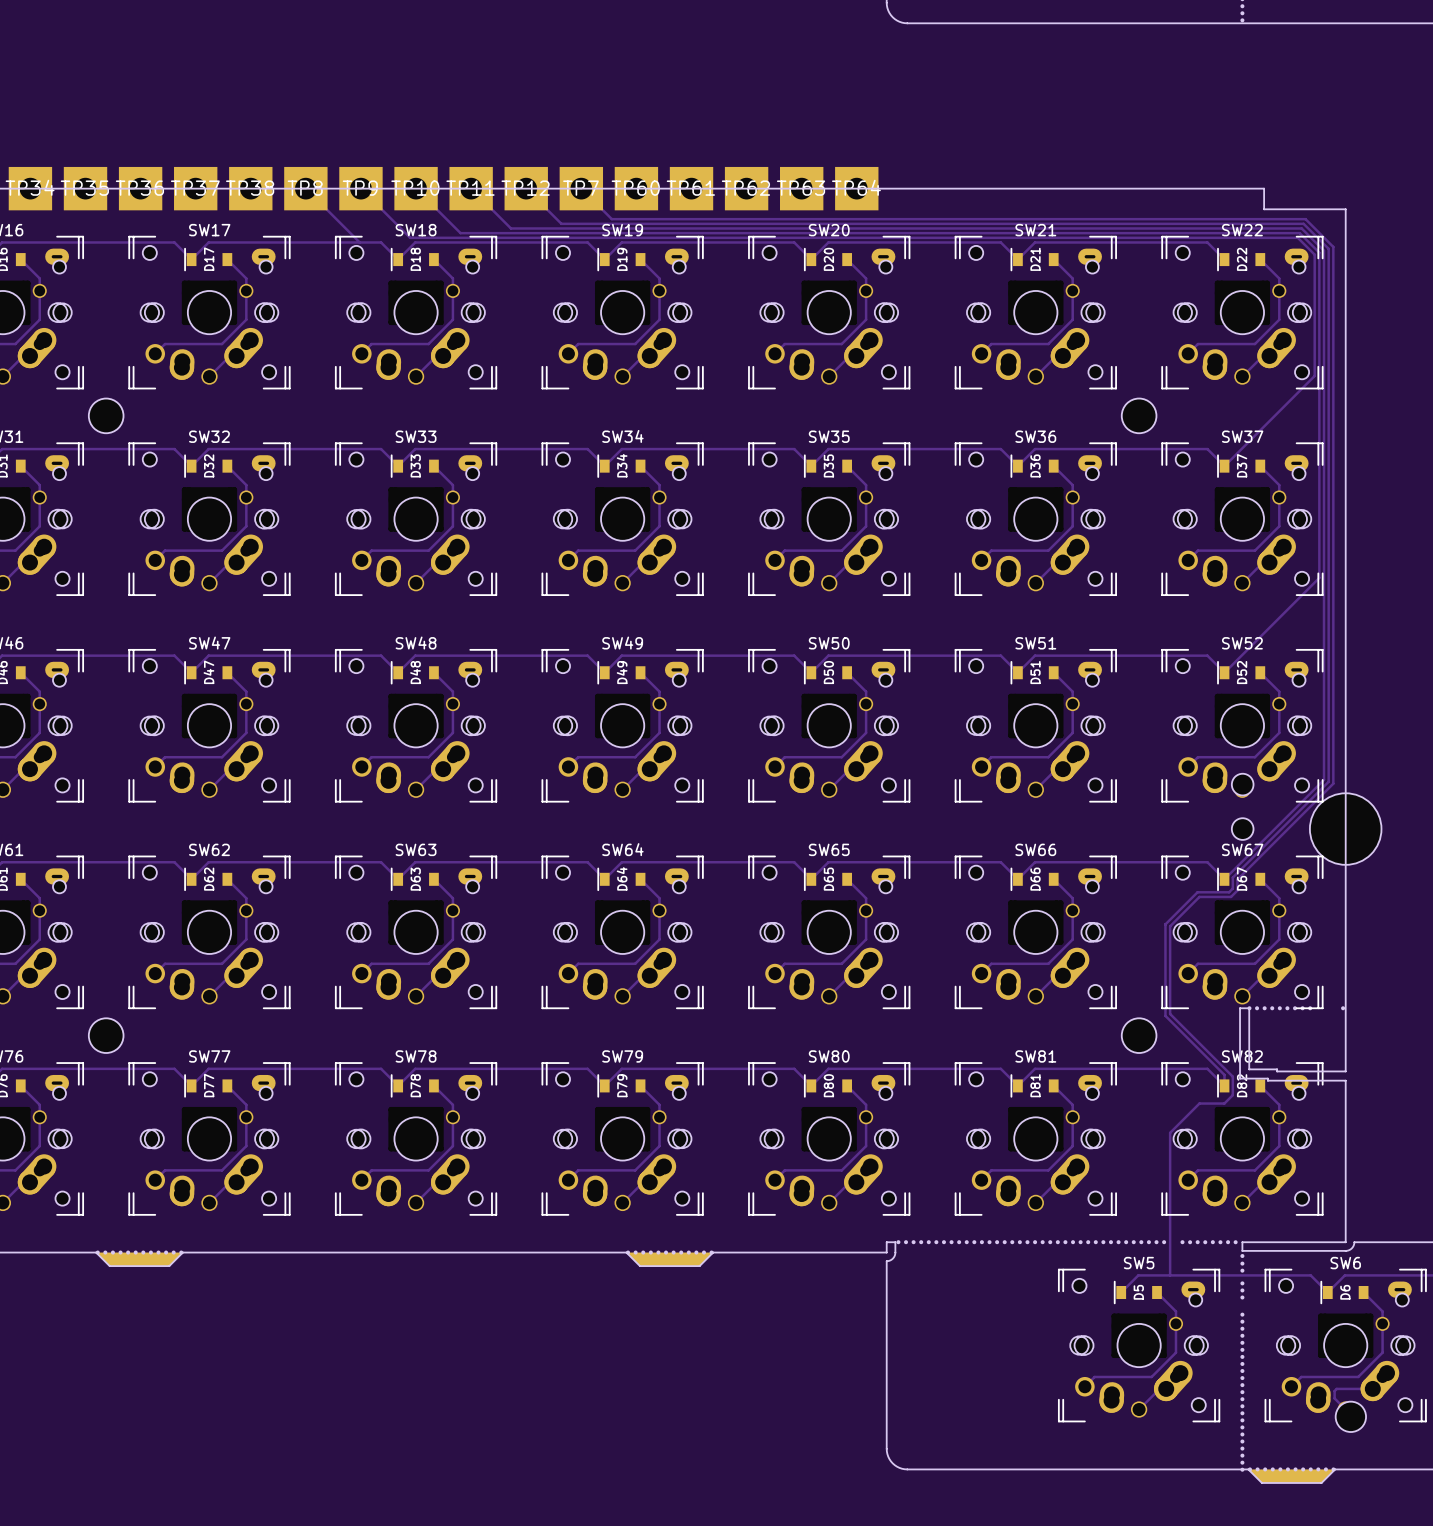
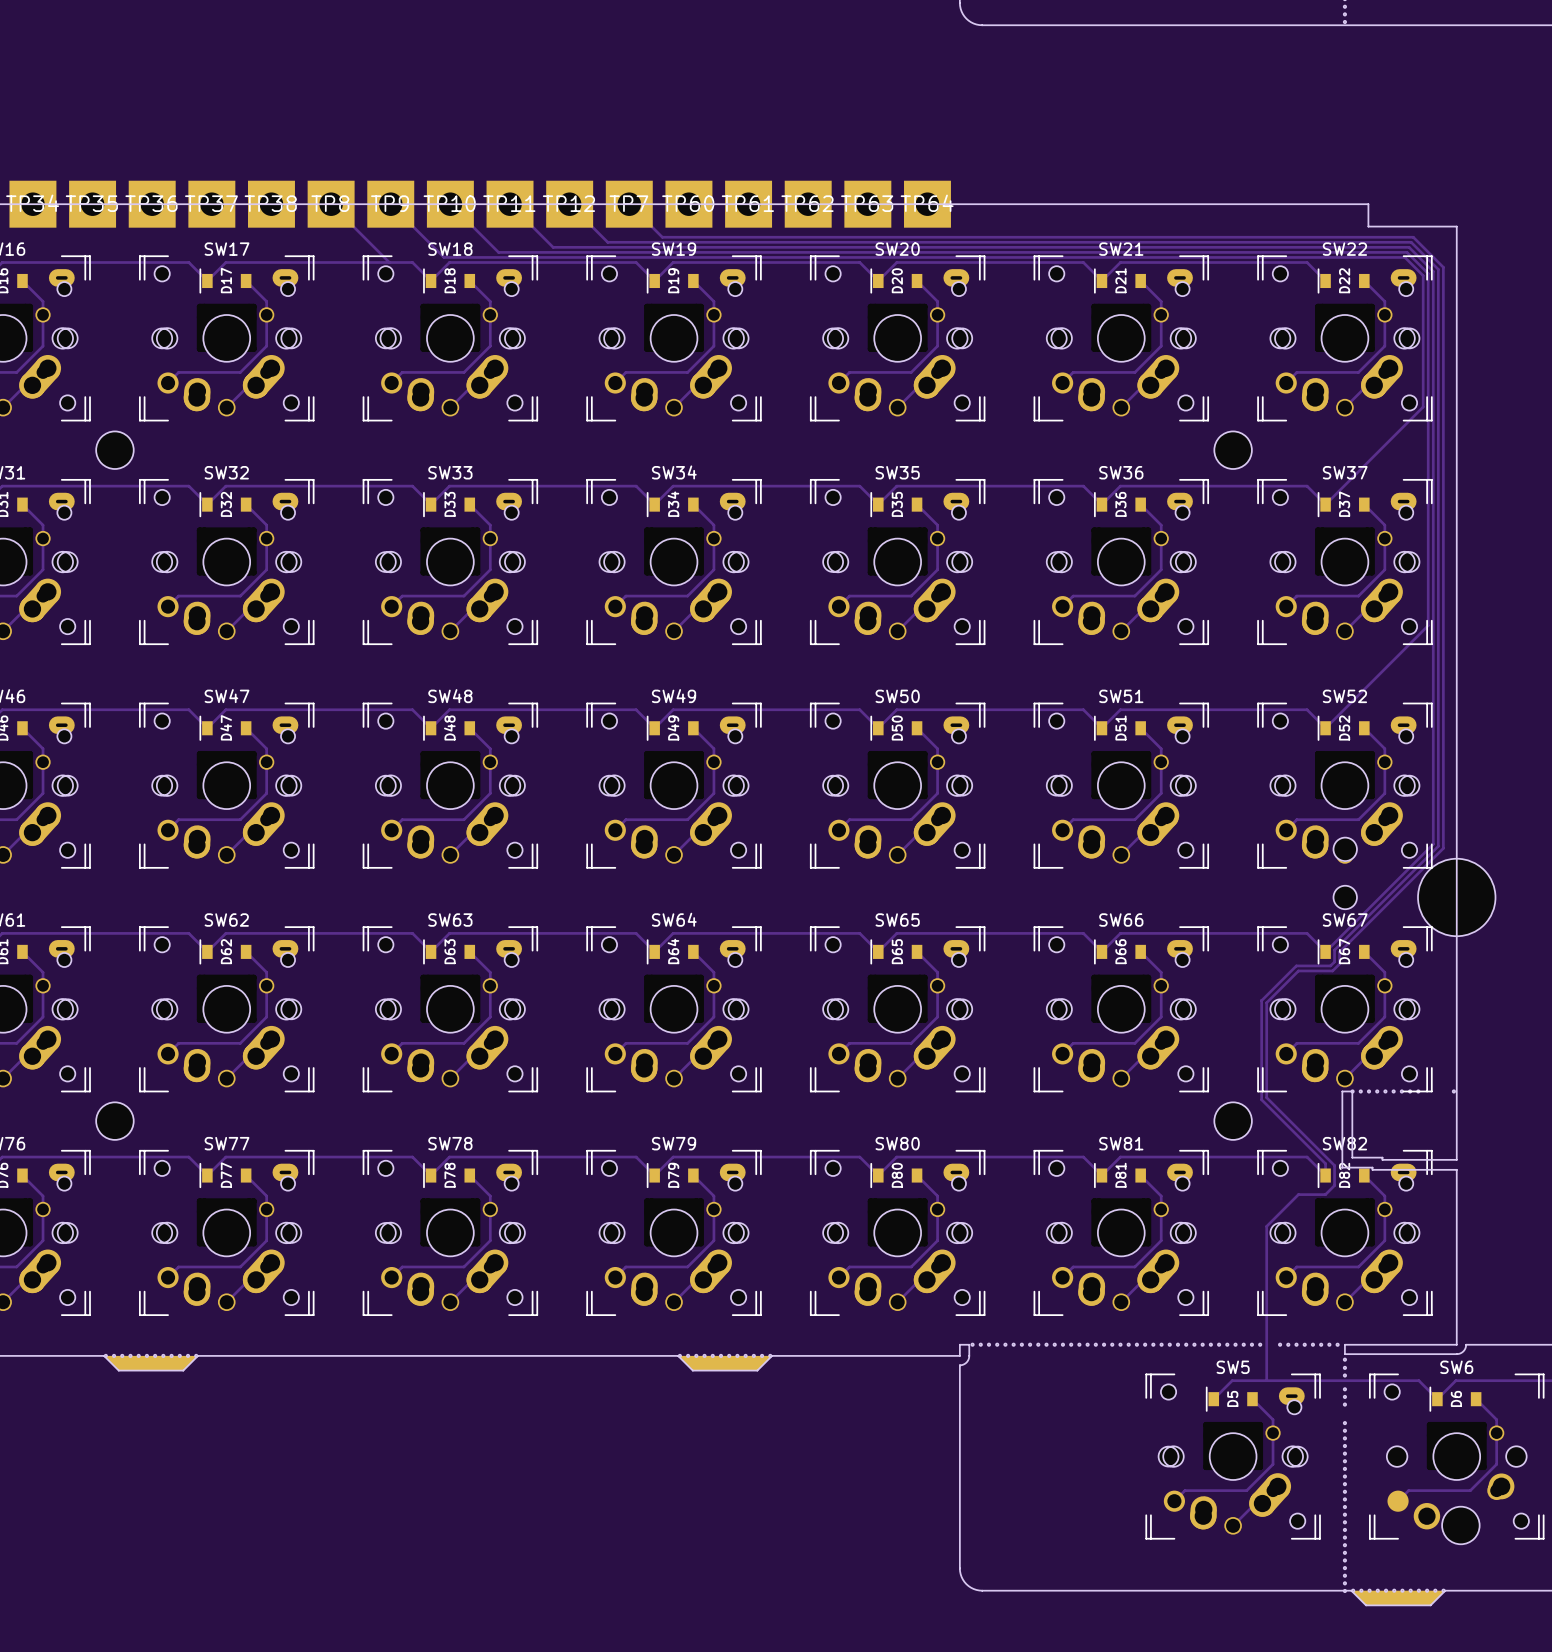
SW6 footprint: [1264, 1268, 1427, 1423] -> [1369, 1373, 1545, 1540]
track: (1372, 1388) (1336, 1388) (1334, 1391) (1334, 1398) (1345, 1409) -> none
part footprint: [1335, 1401, 1367, 1433] -> [1442, 1506, 1480, 1545]

